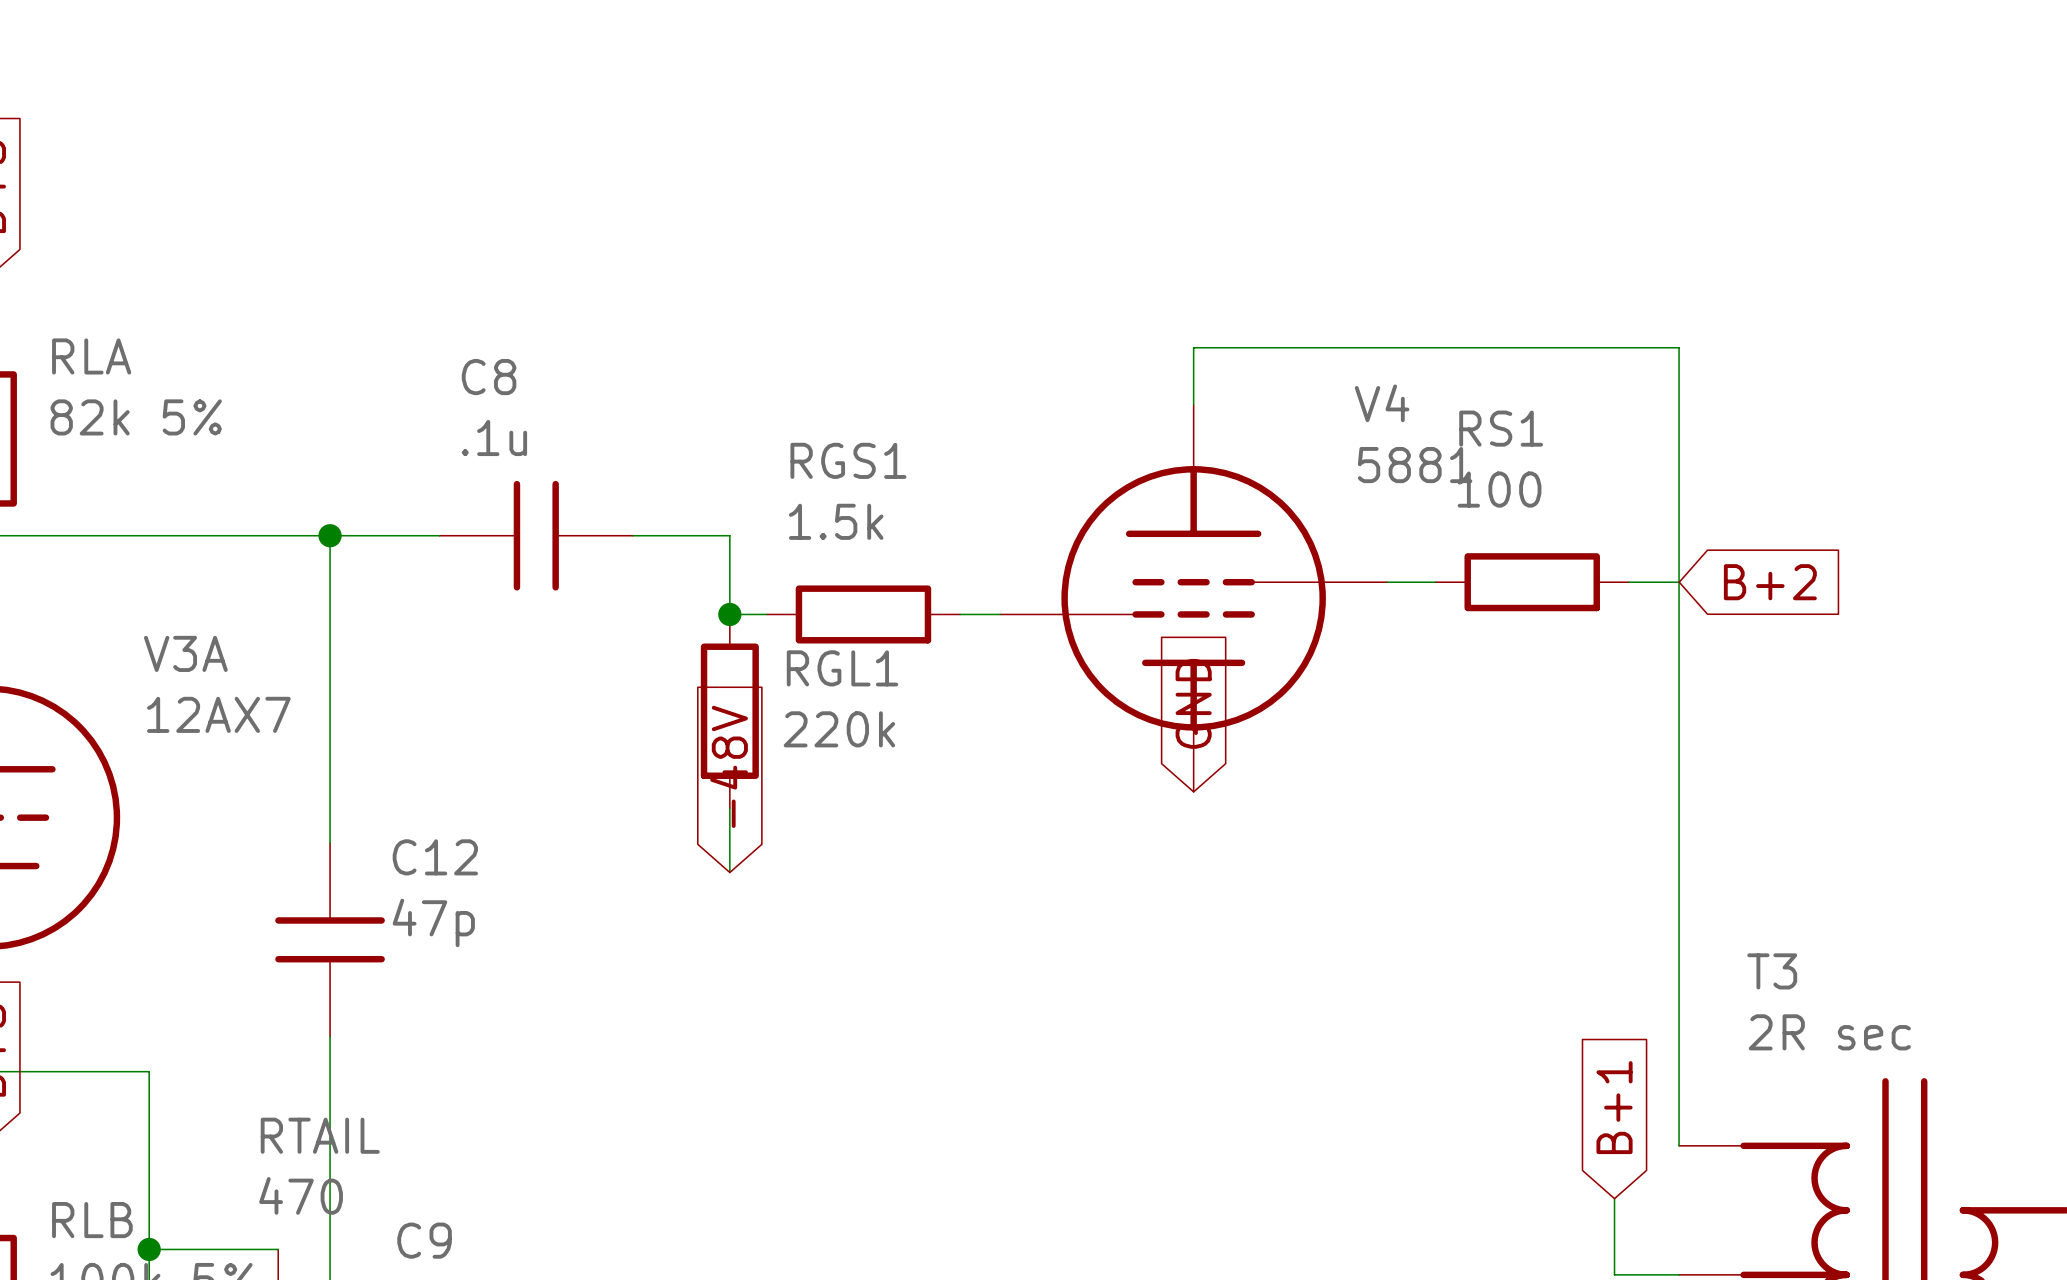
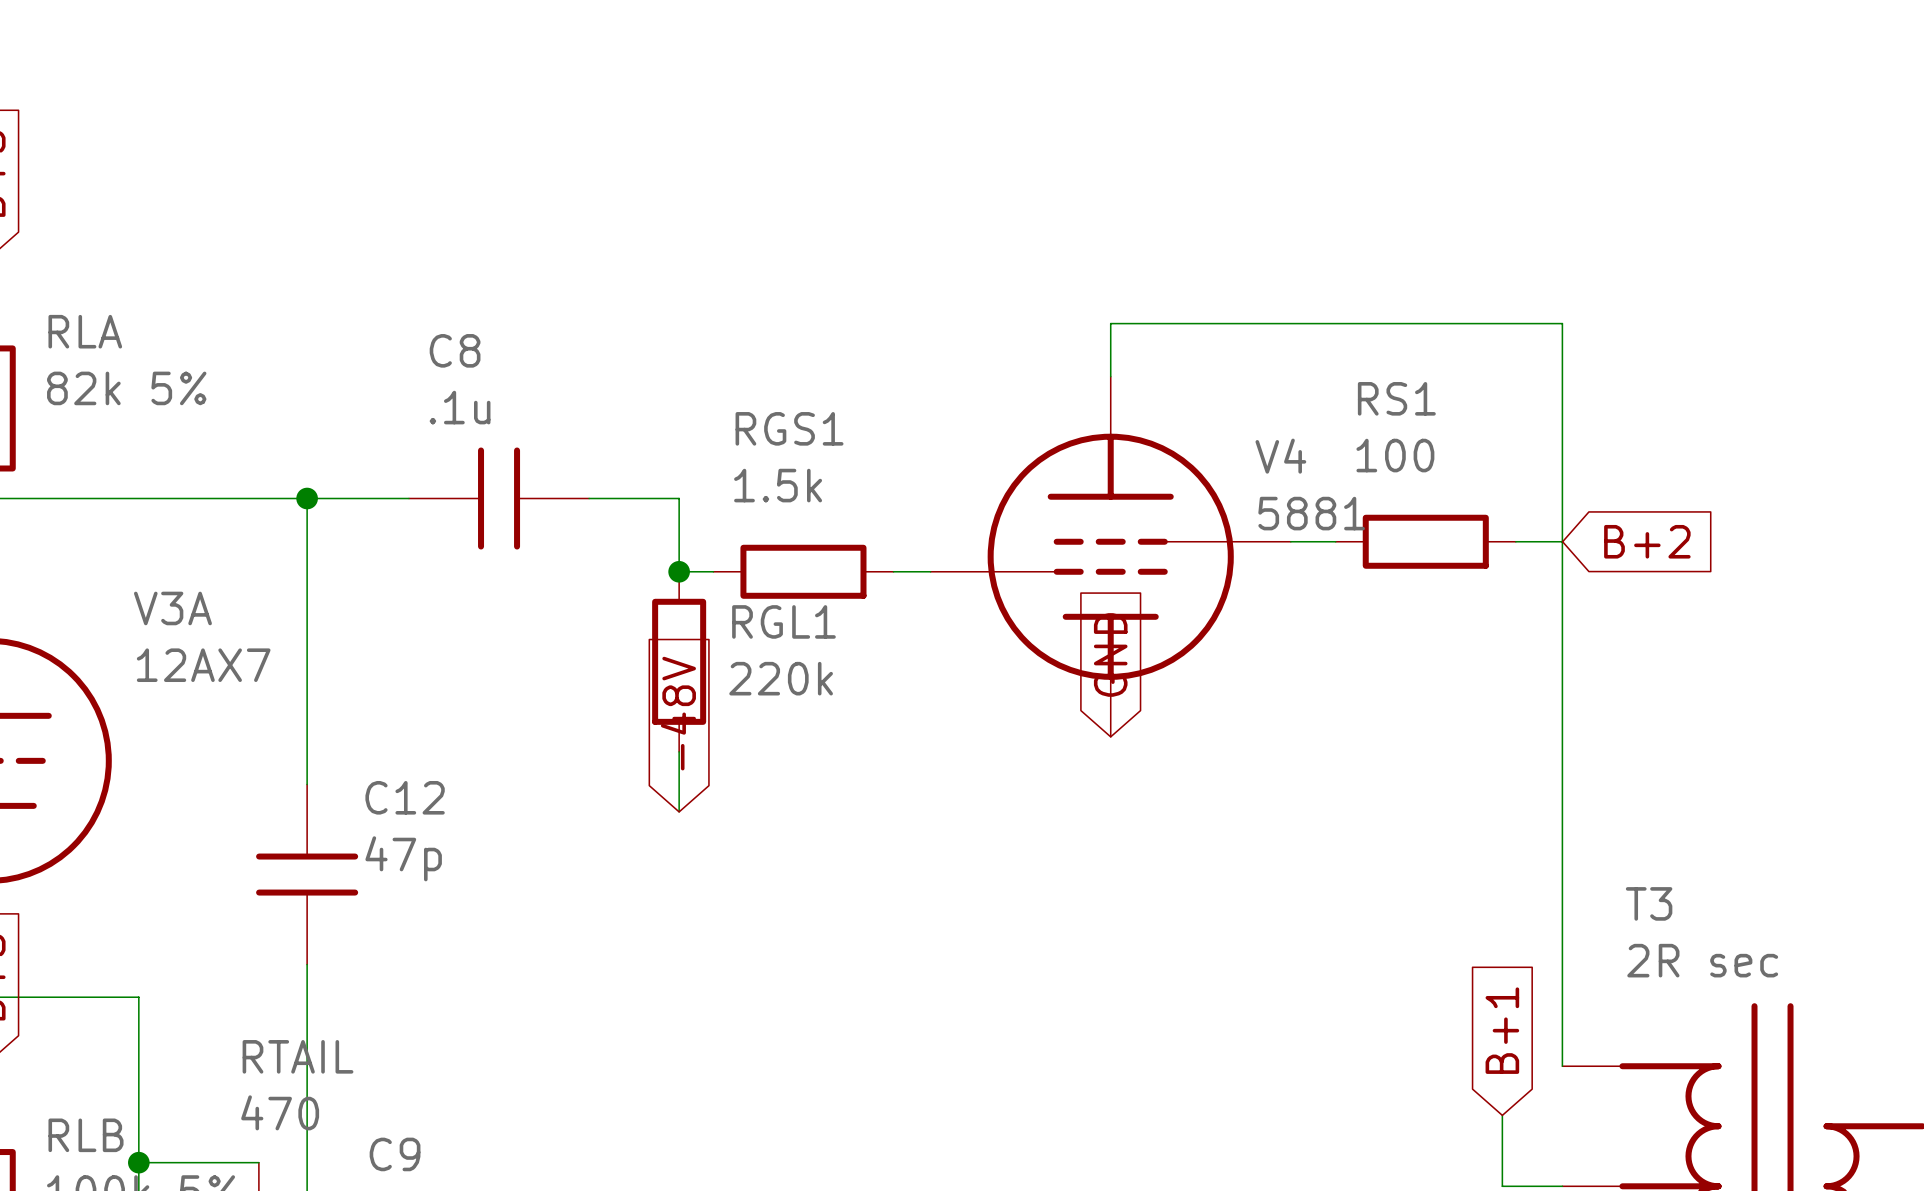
V4 name position: V4 (1382, 403) -> V4 (1280, 456)
V4 value position: 5881 (1415, 465) -> 5881 (1311, 513)

